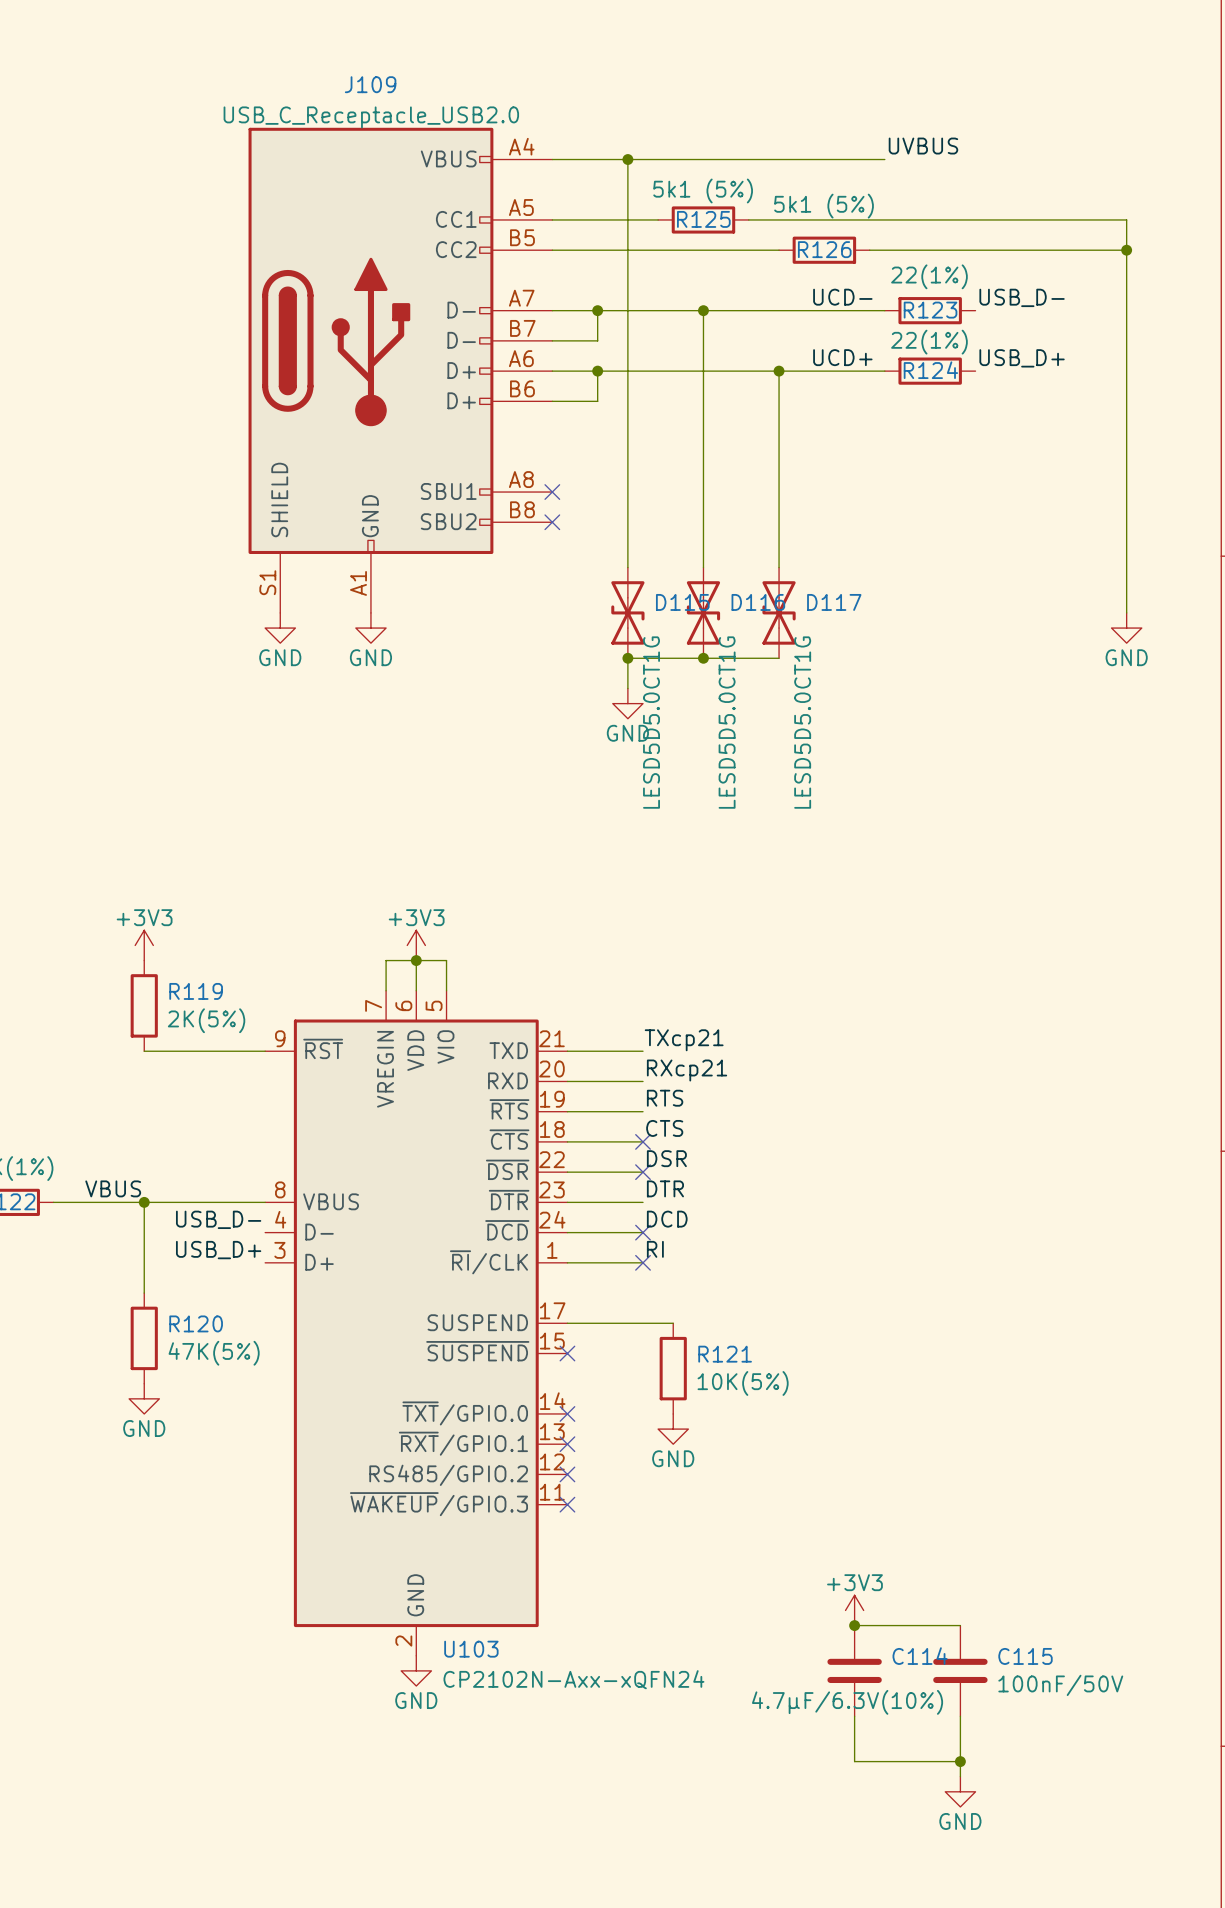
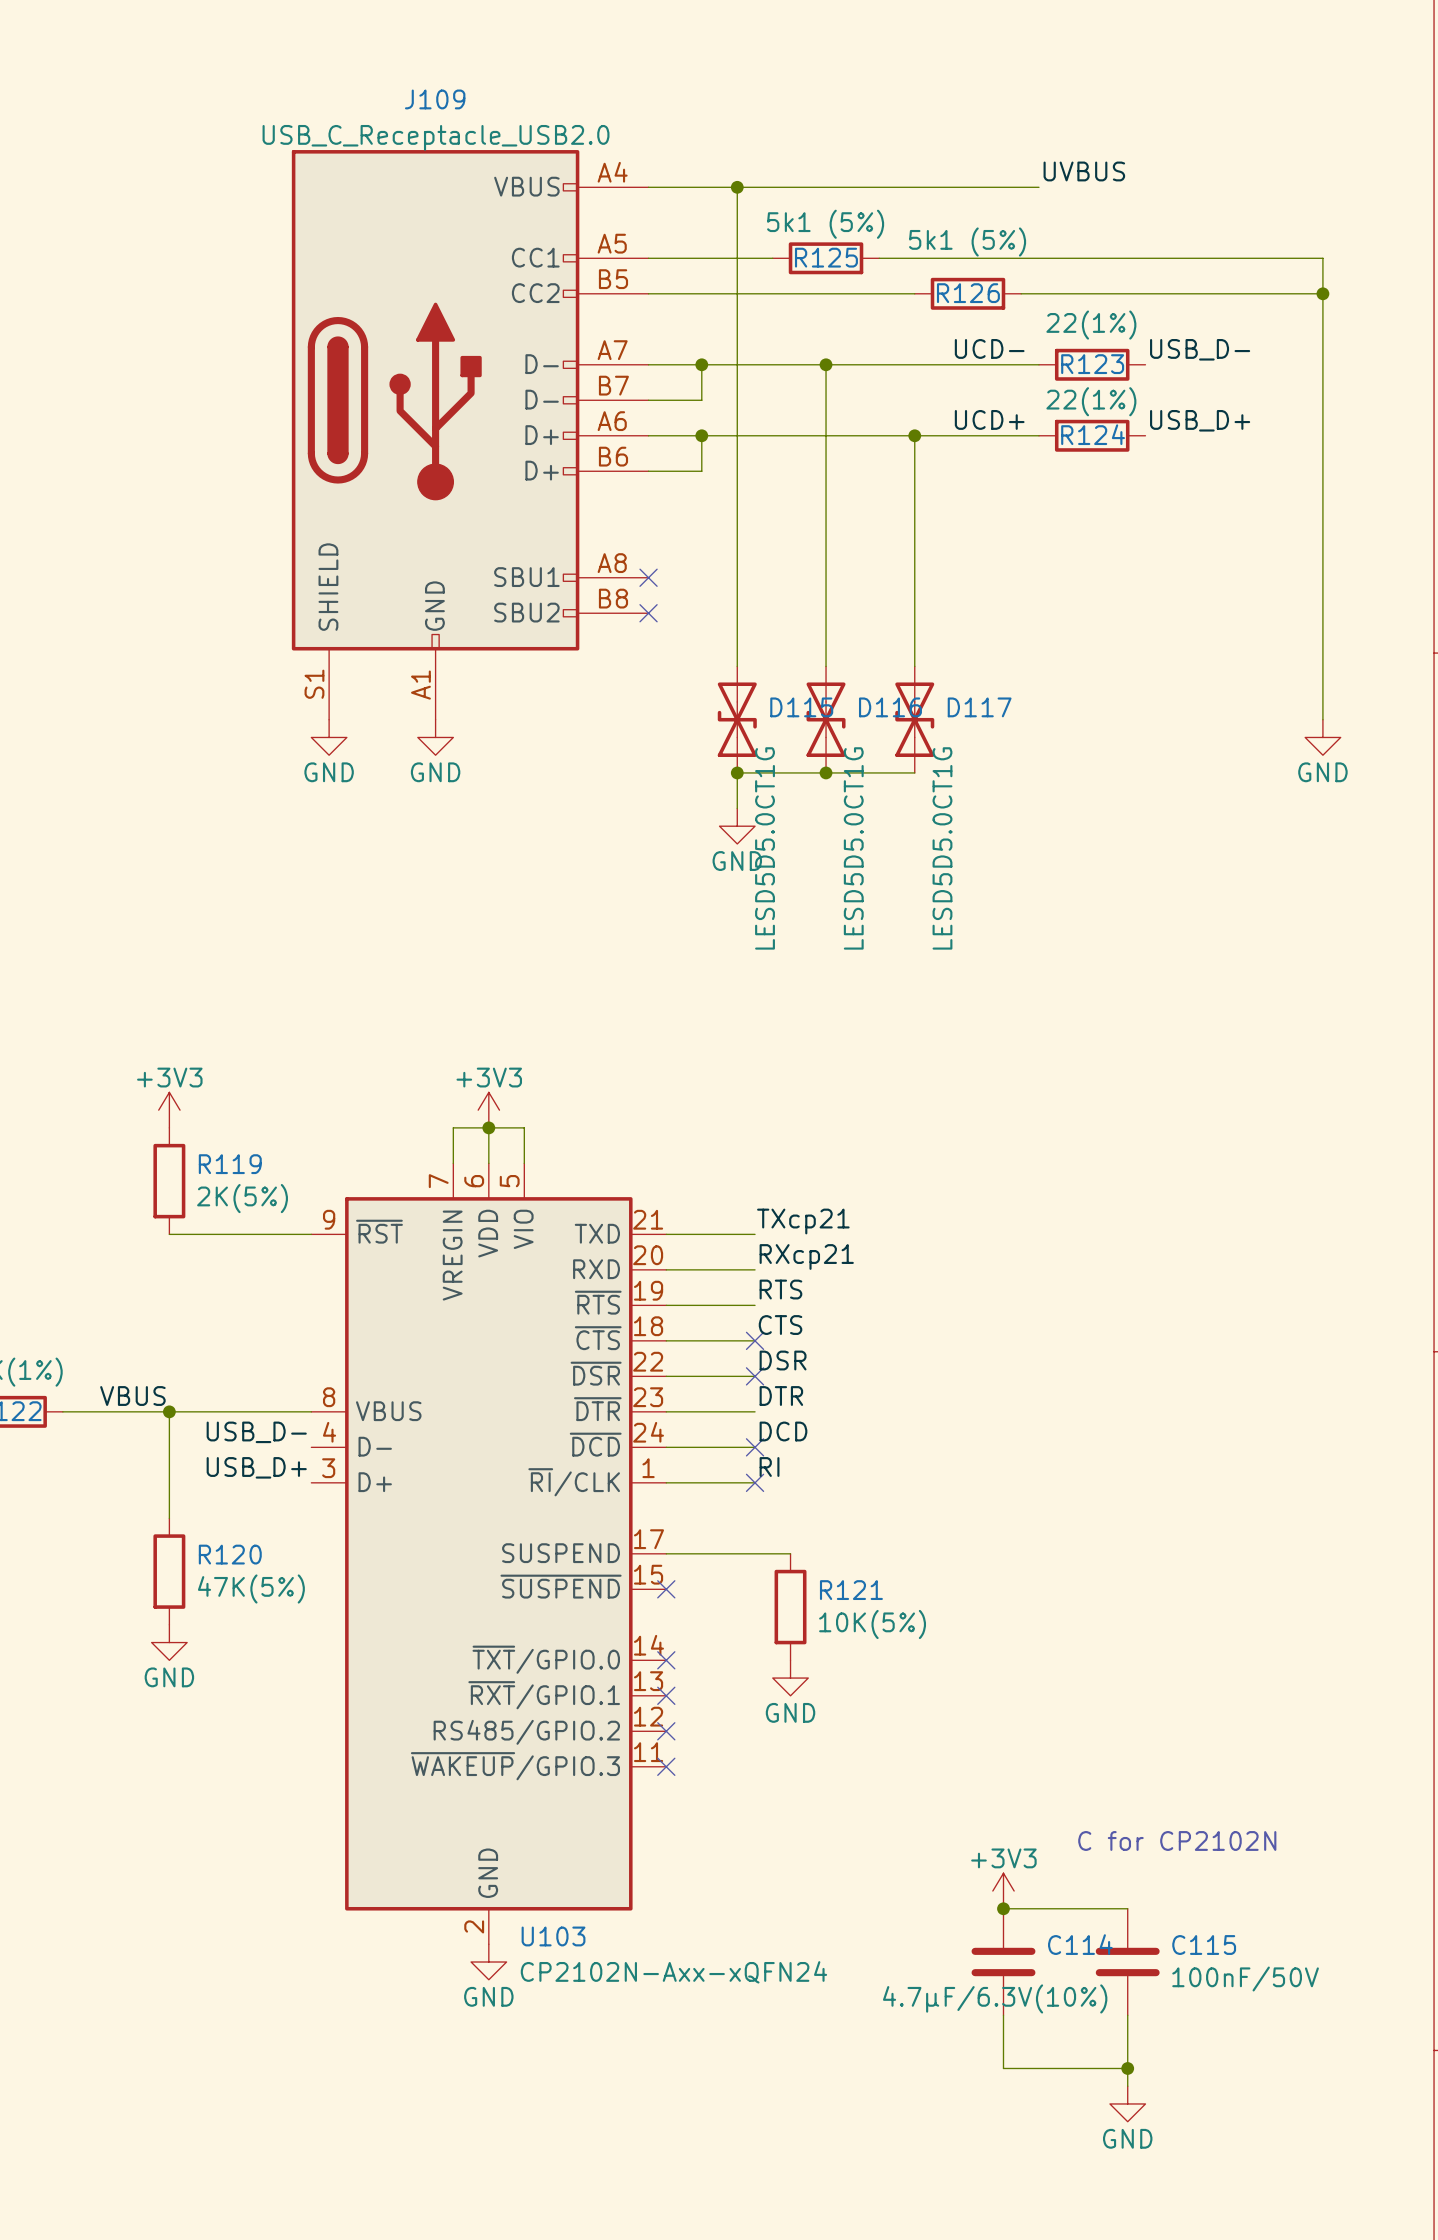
text: none -> C for CP2102N (1177, 1840)

